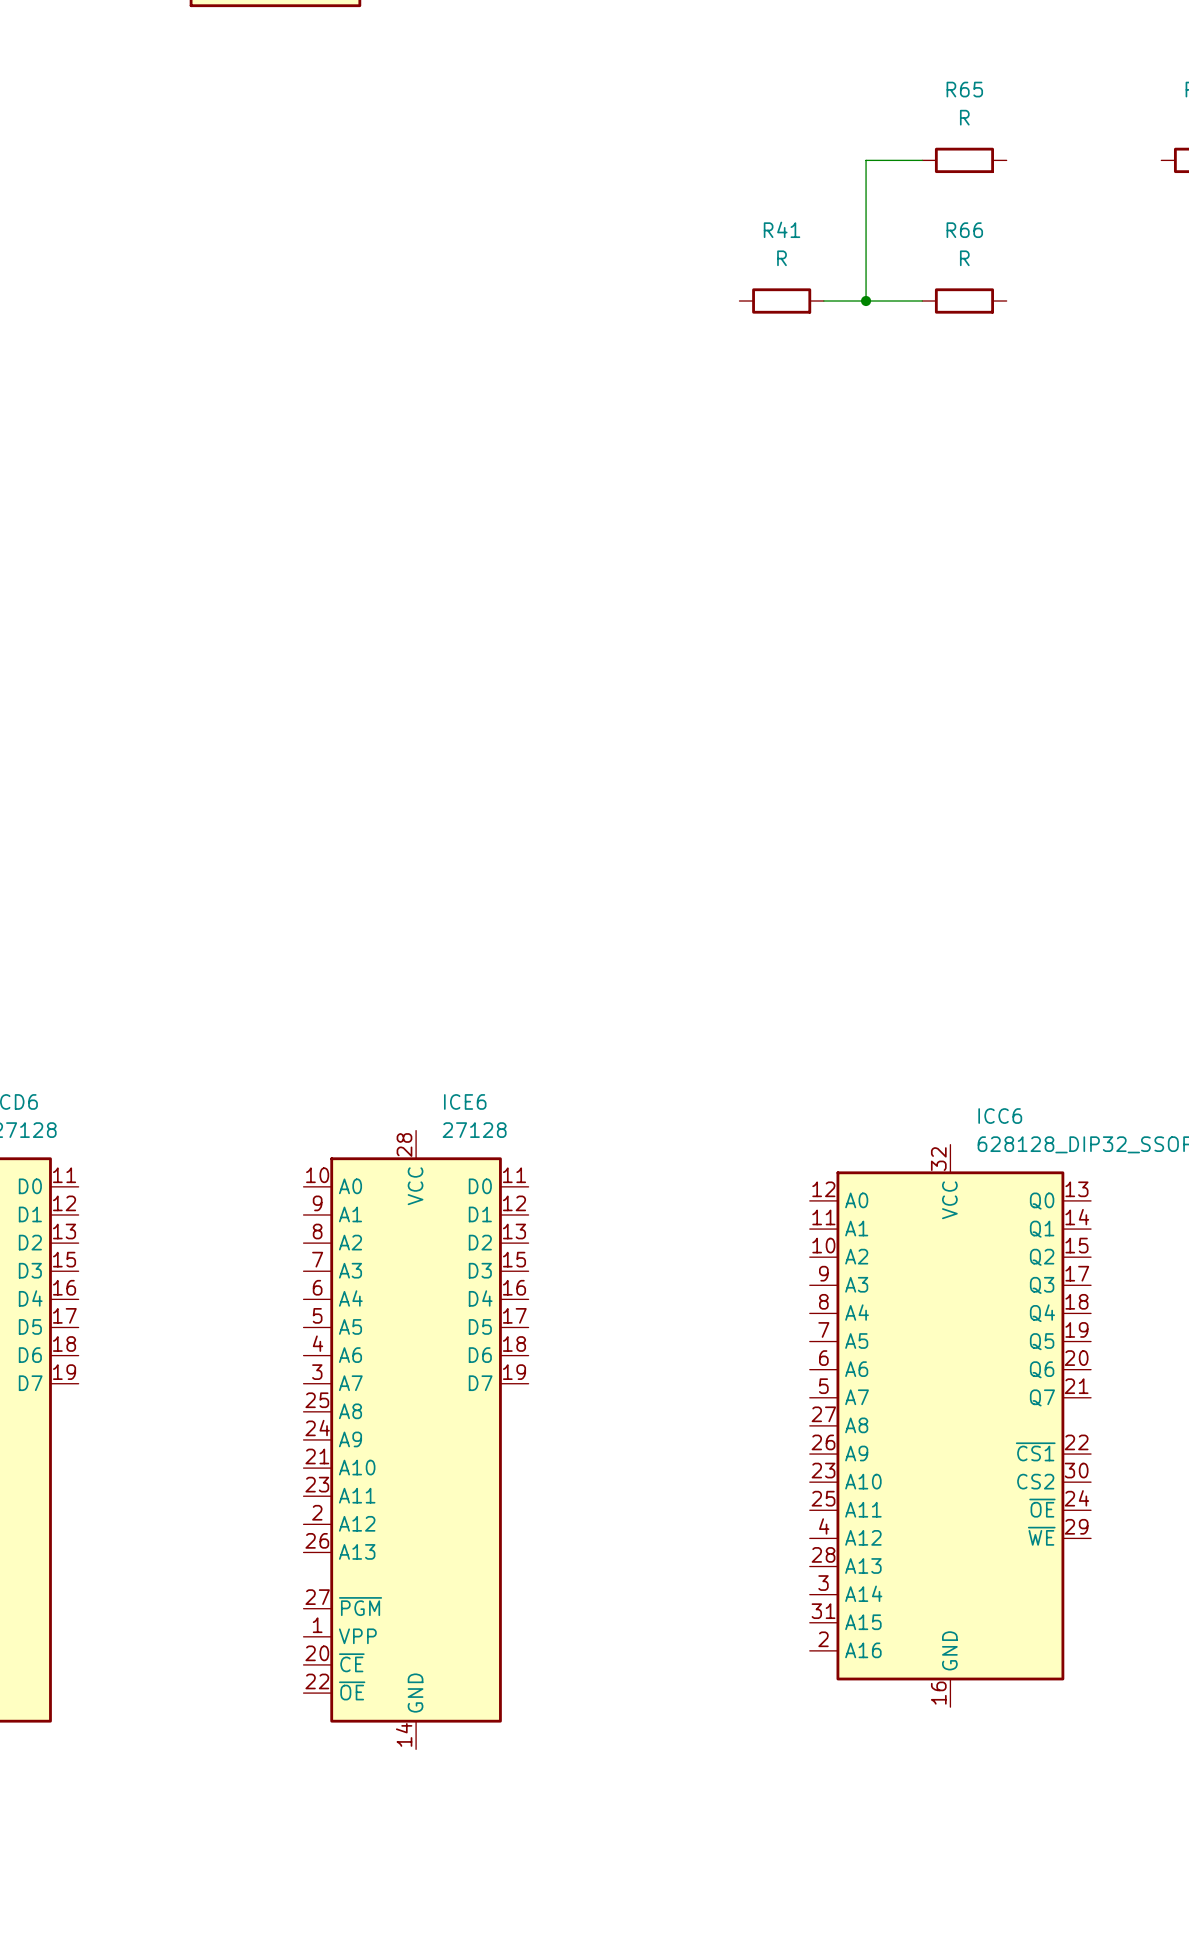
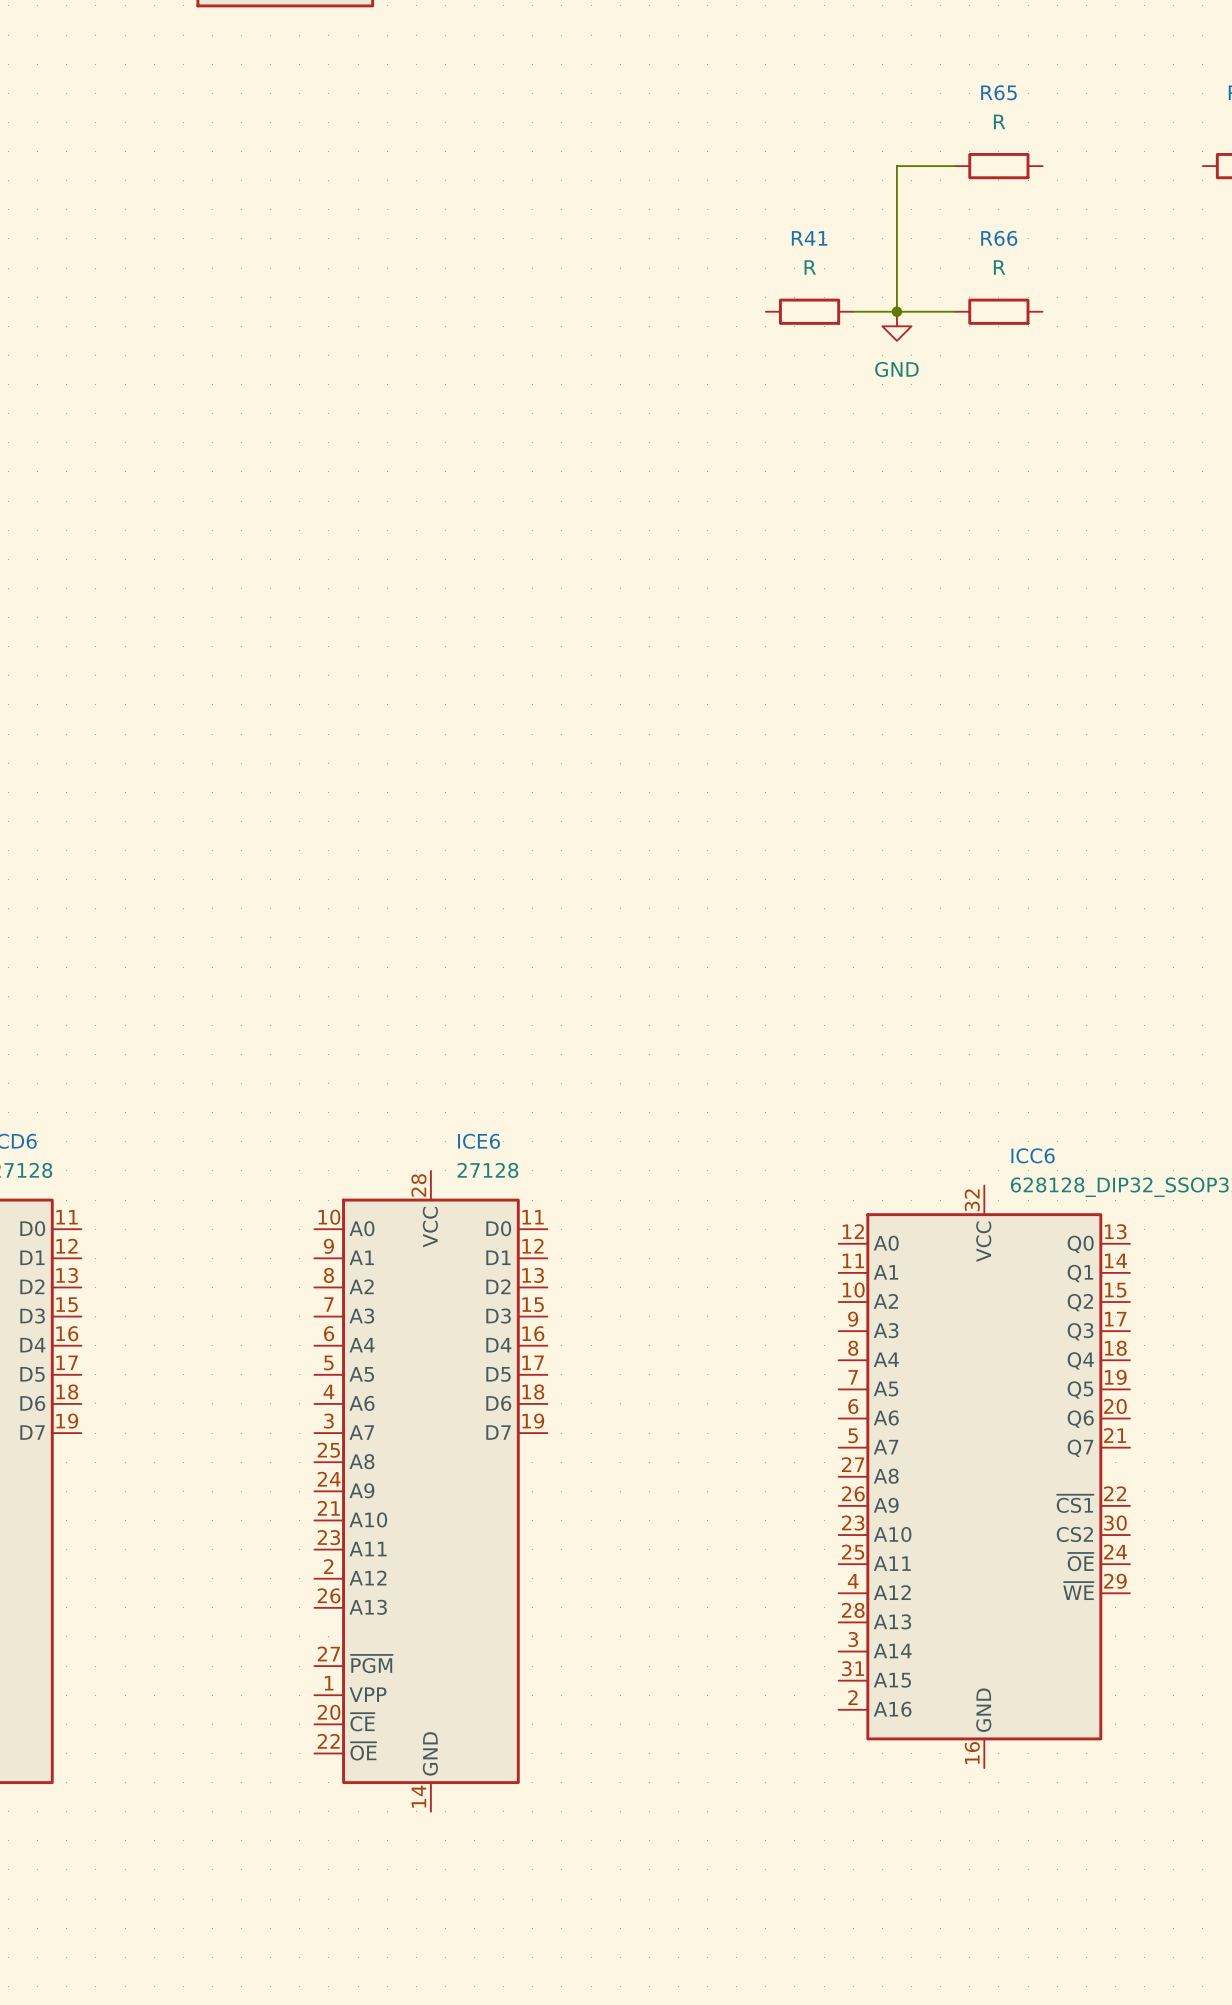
power symbol: none -> GND (896, 326)

